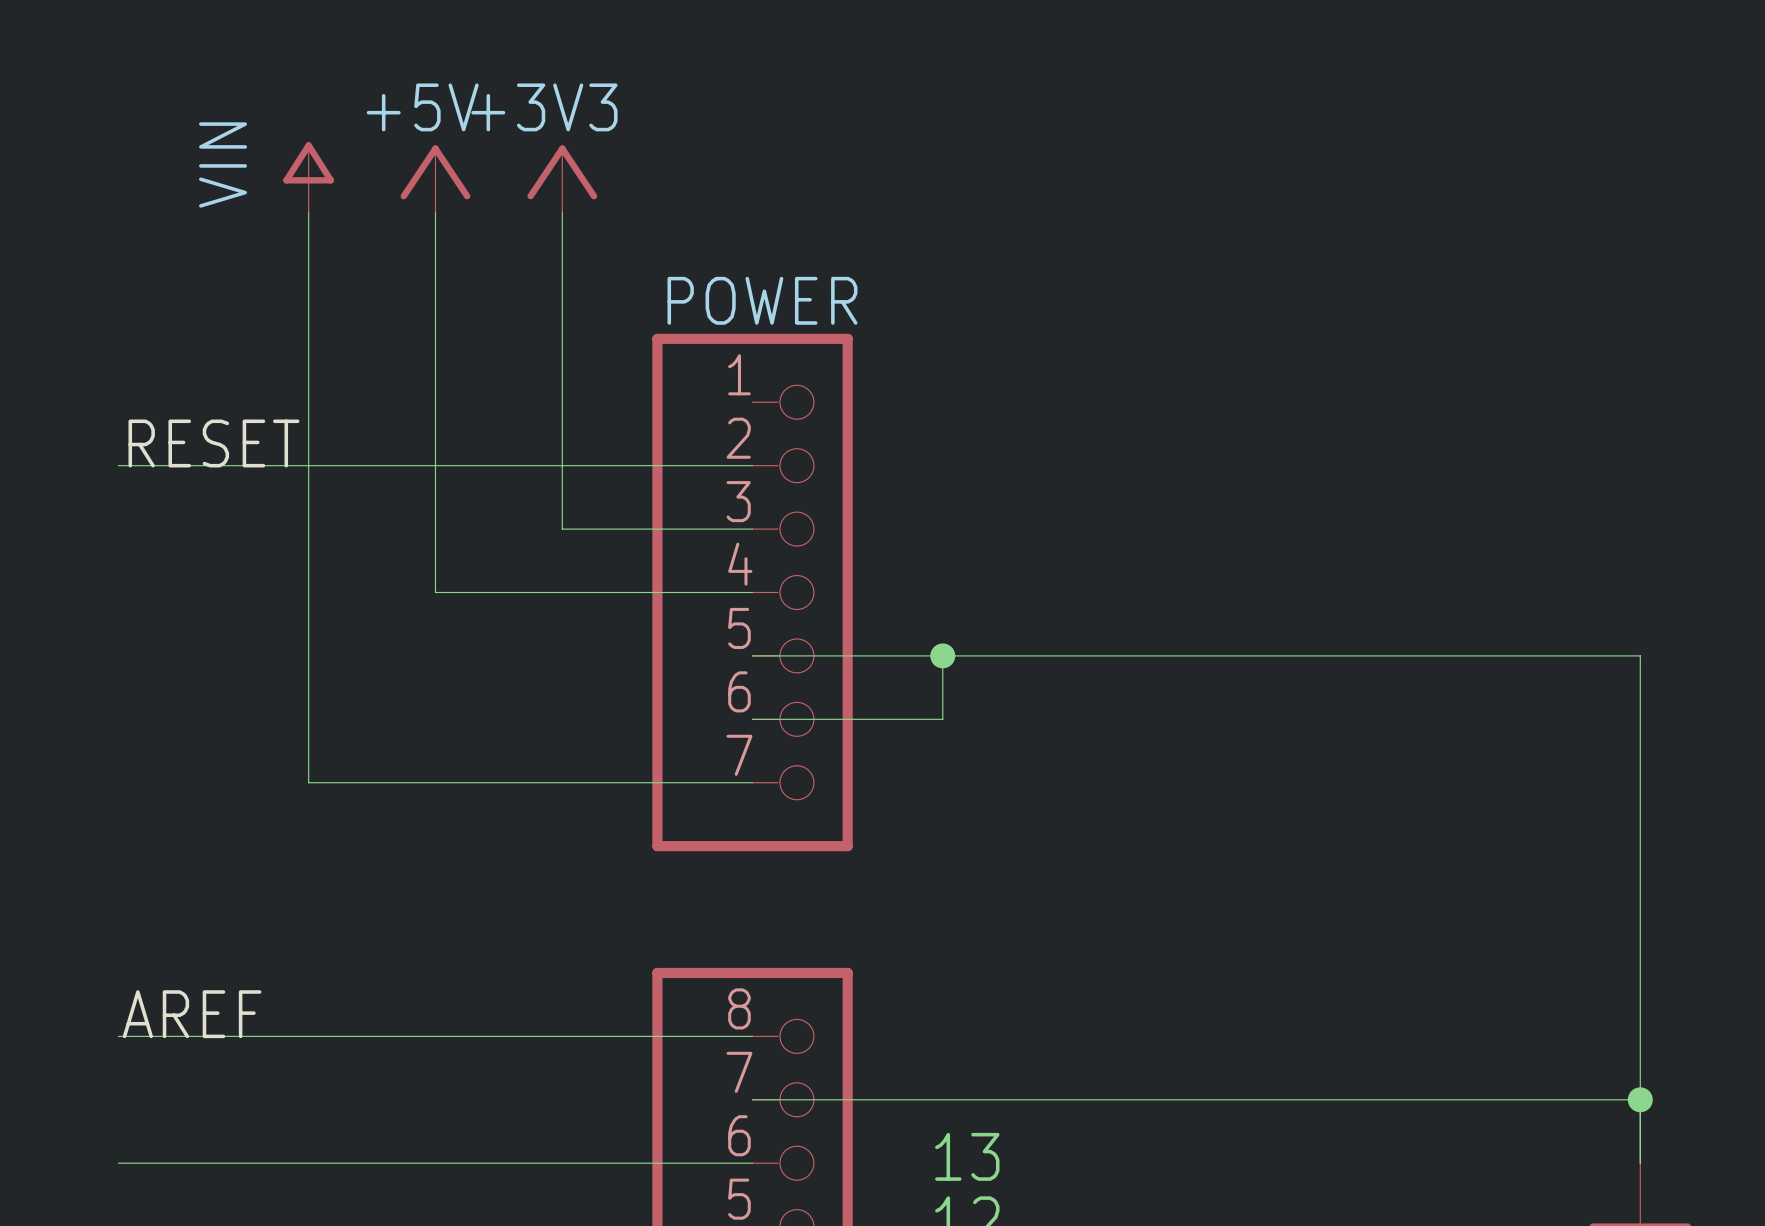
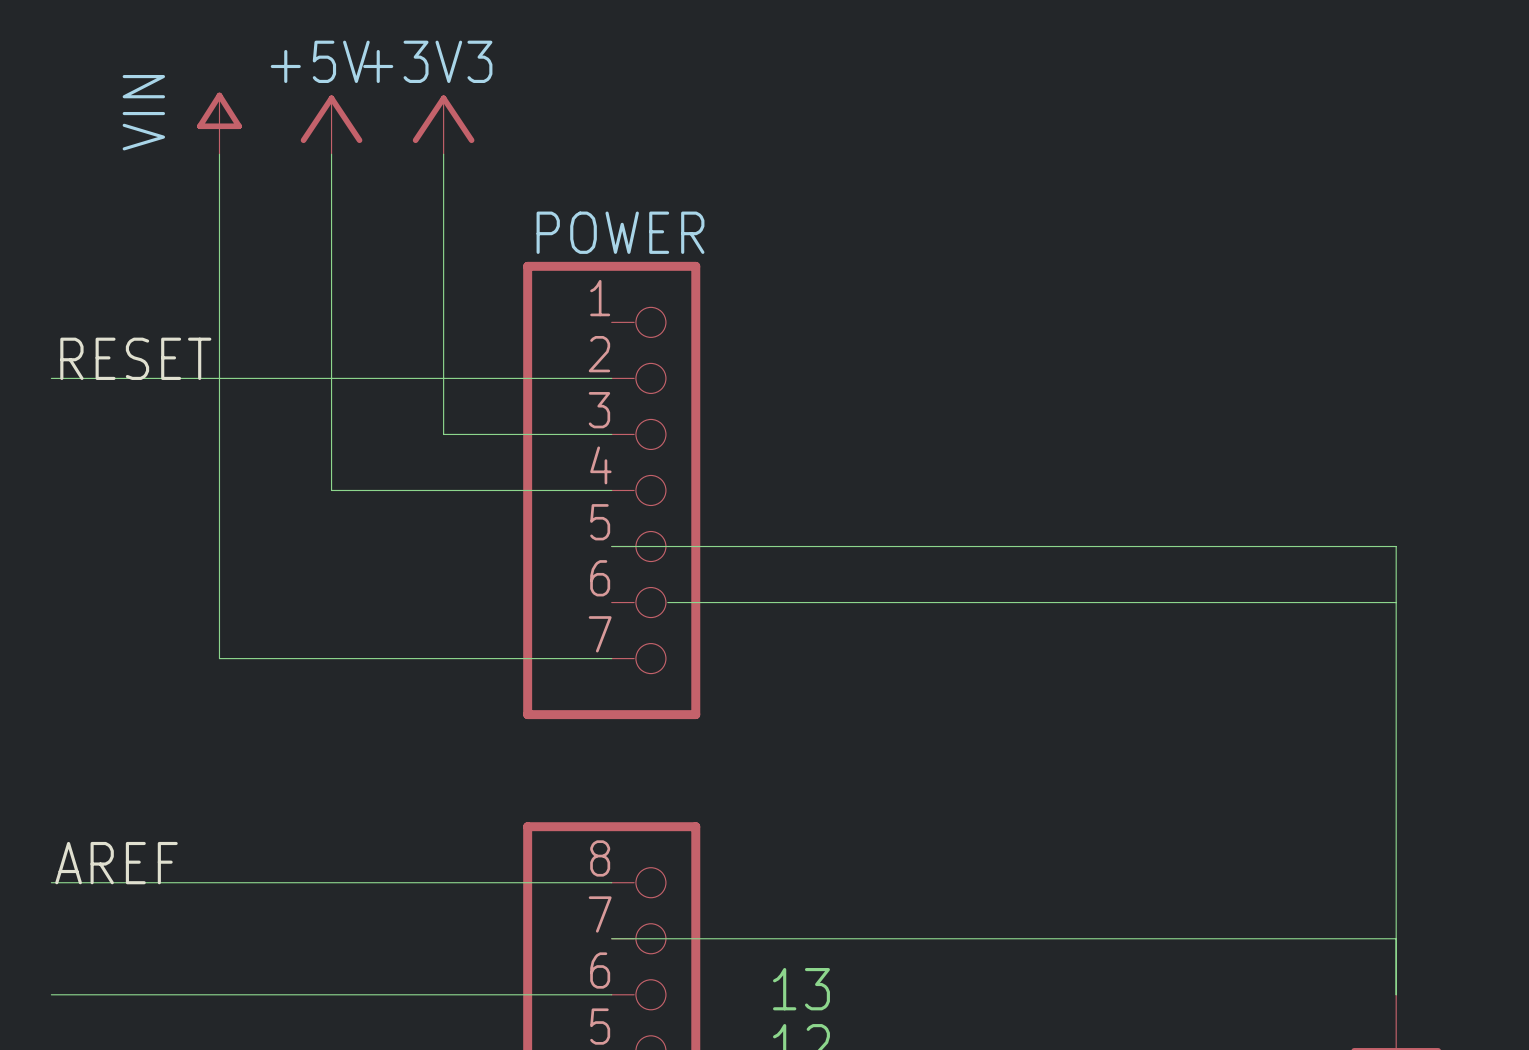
wire: (942, 655) (942, 719) -> (1396, 602) (779, 602)
junction: (942, 655) -> none
wire: (752, 719) (815, 719) -> none
junction: (1640, 1099) -> none

